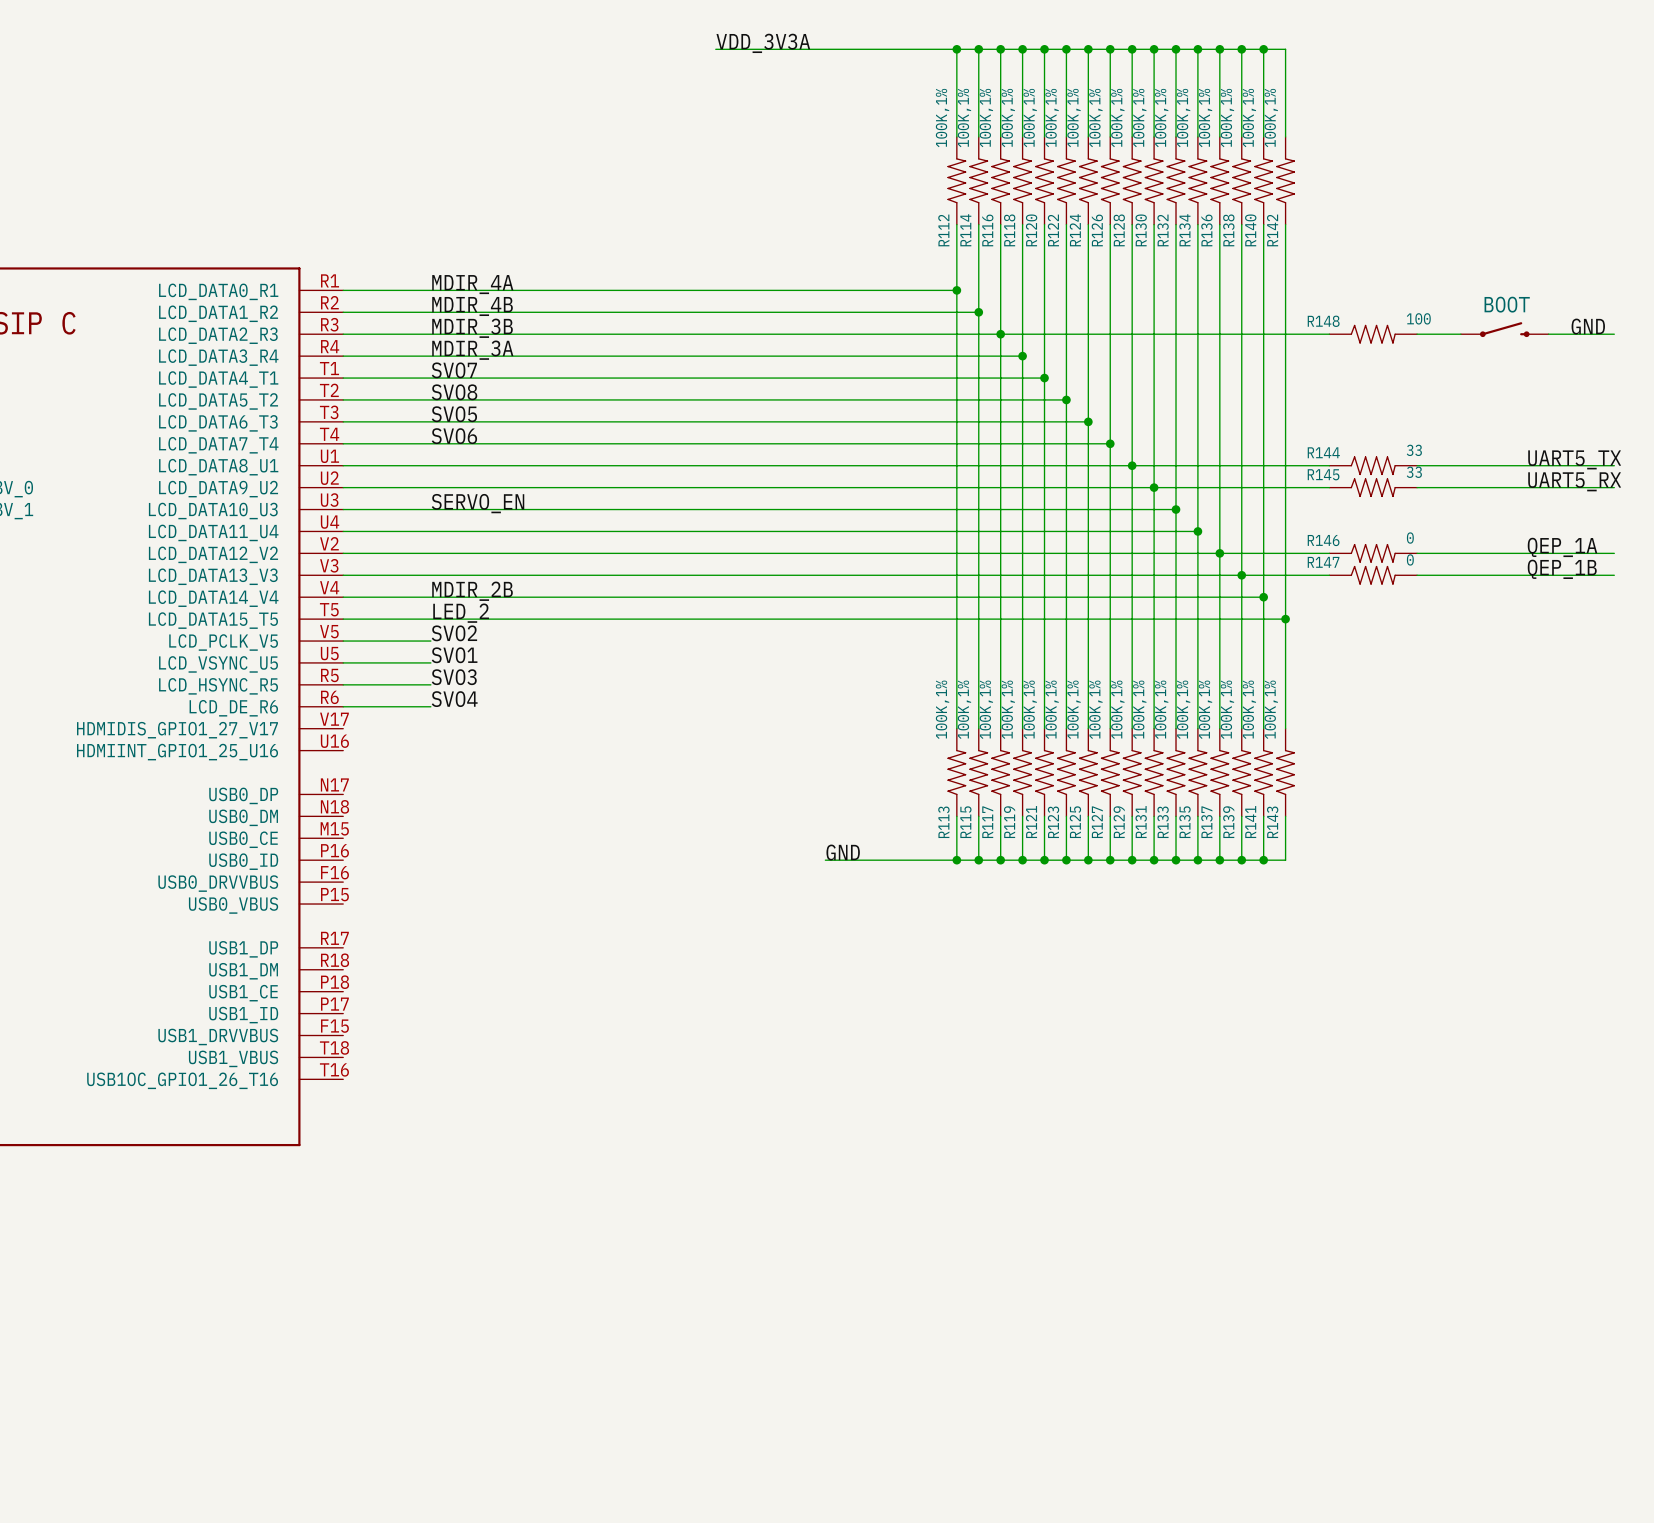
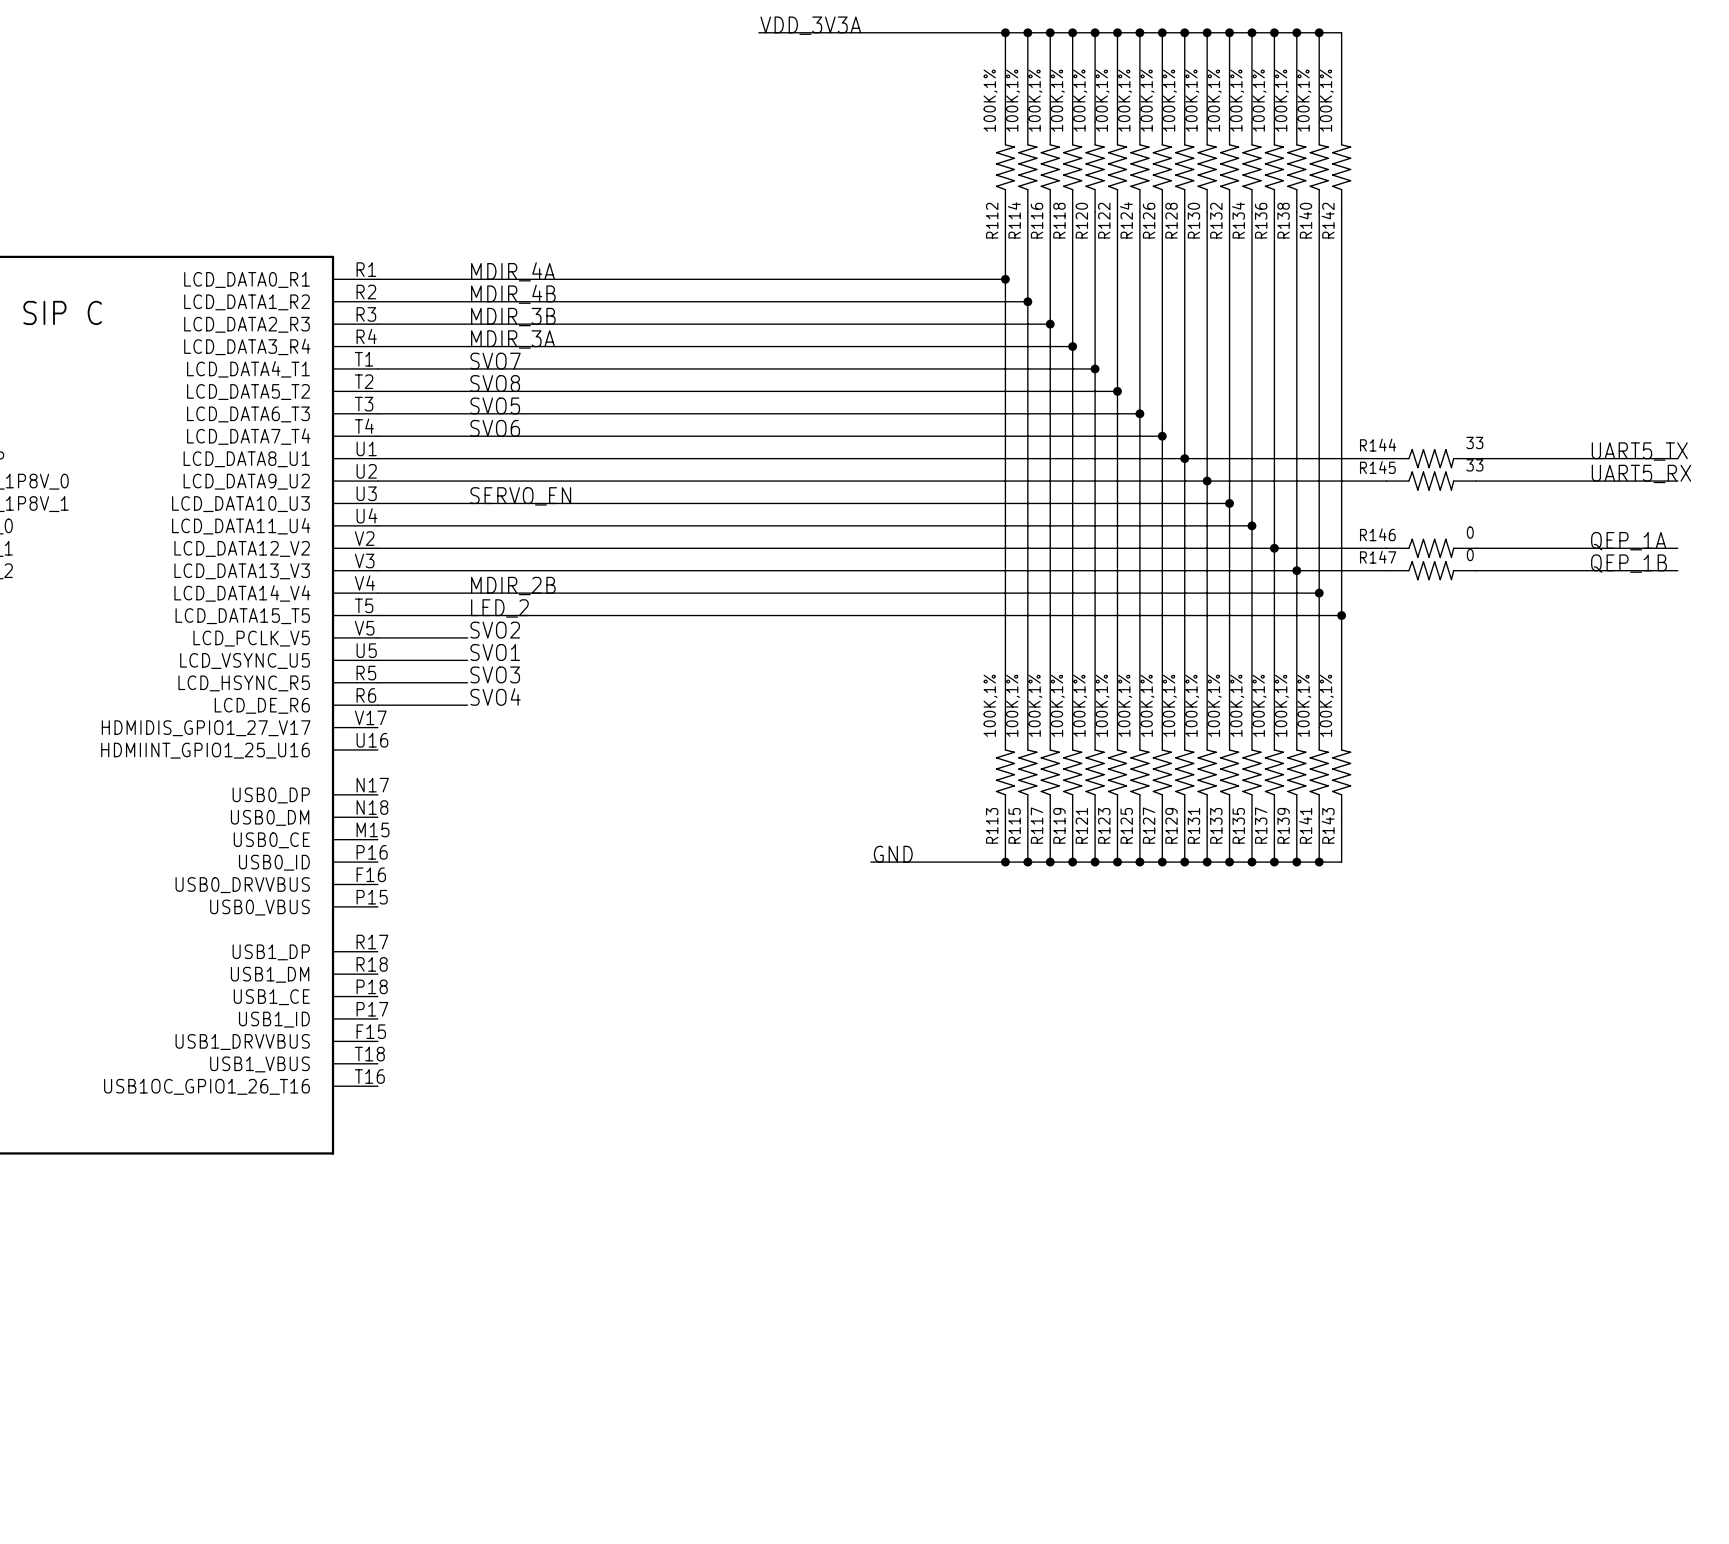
label: GND (1588, 326) -> none
BOOT: (1504, 329) -> none
wire: (1000, 334) (1329, 334) -> none
R148: 100 (1373, 334) -> none
wire: (1417, 334) (1460, 334) -> none
wire: (1548, 334) (1614, 334) -> none

